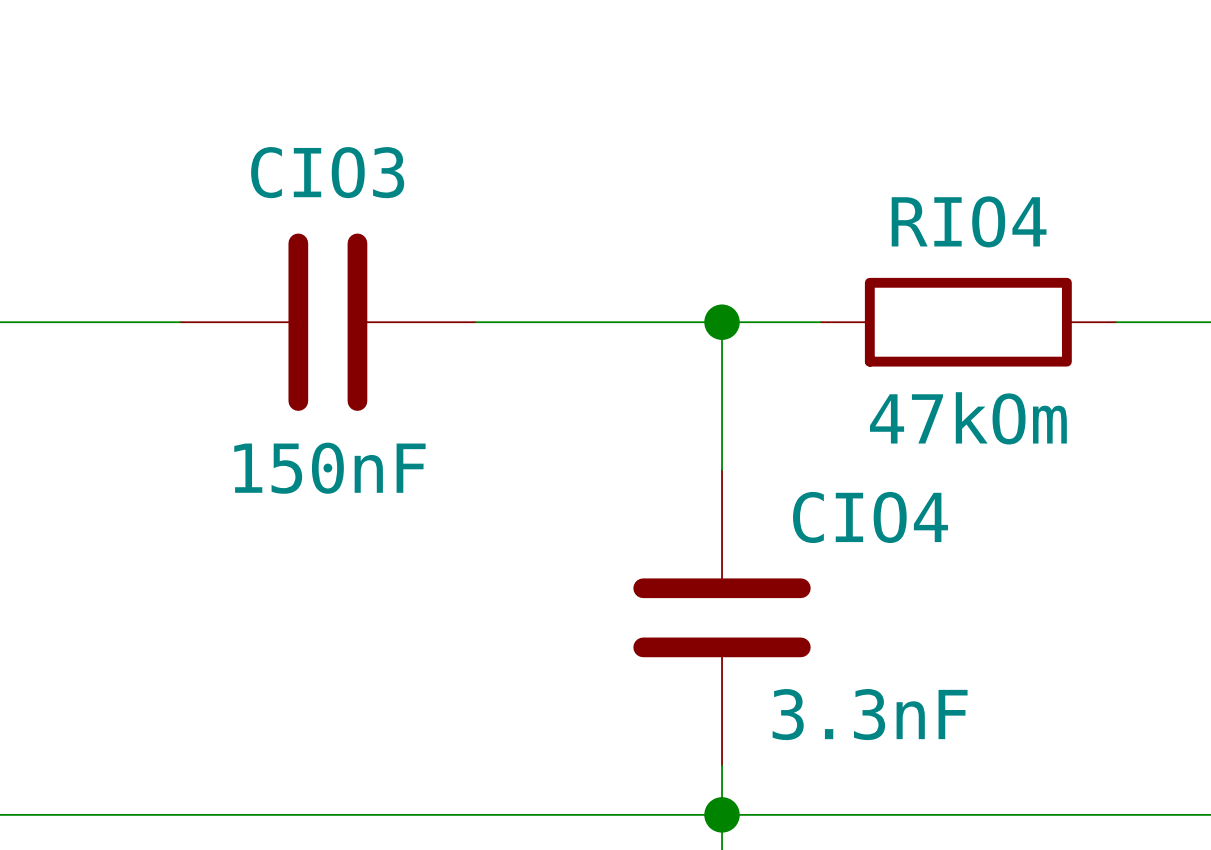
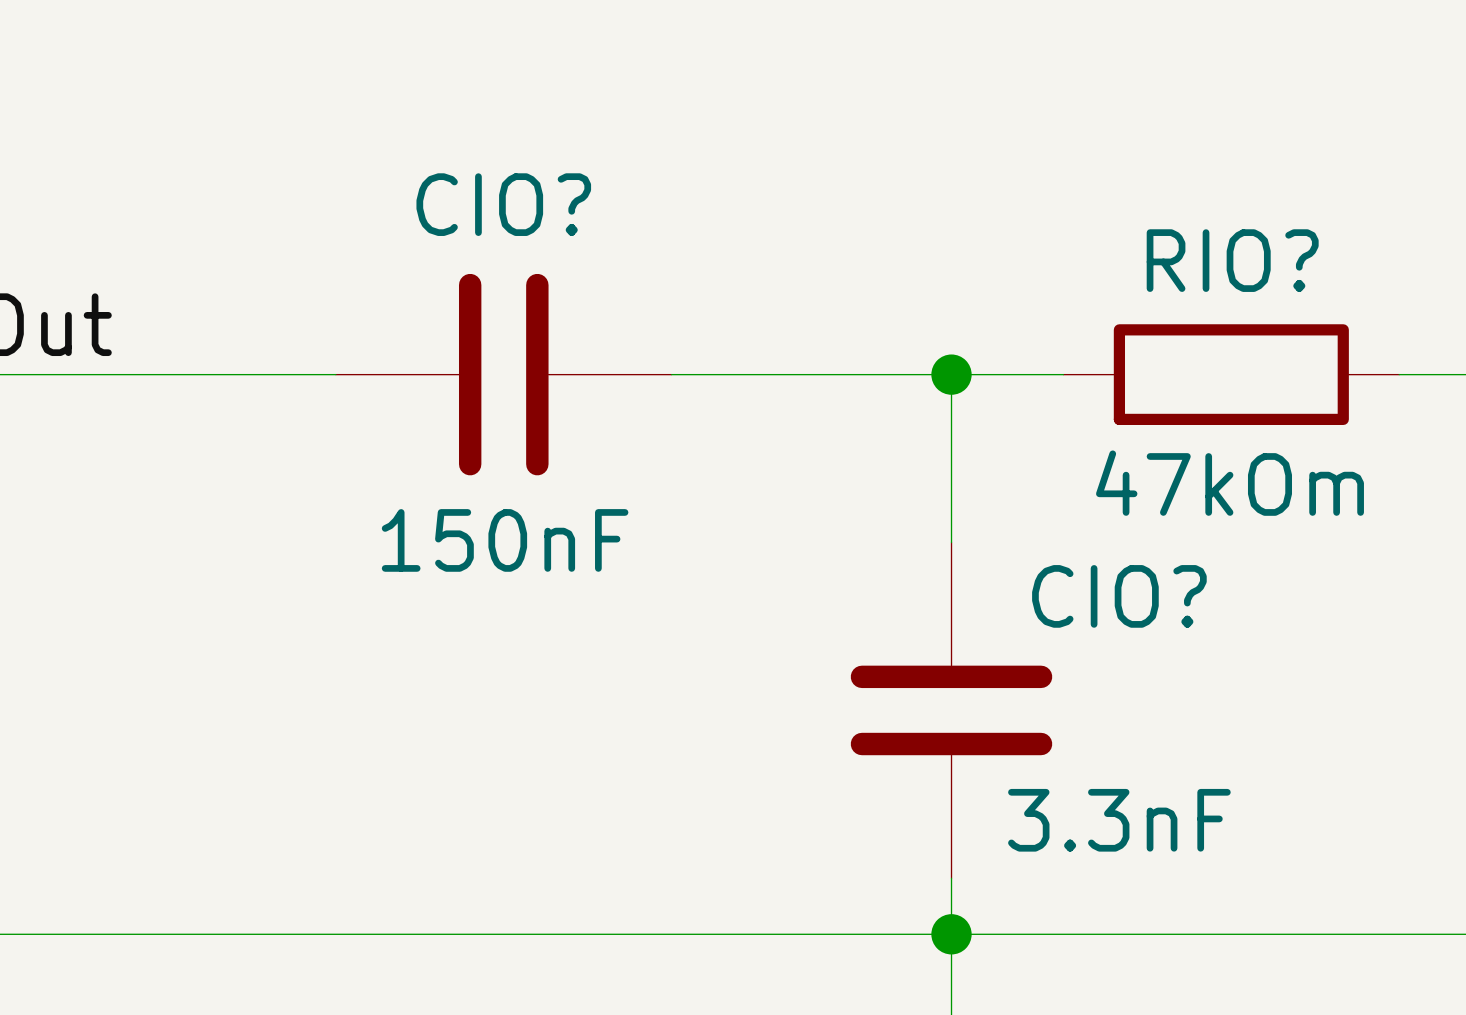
CIO3 name: CIO3 (327, 172) -> CIO? (503, 204)
RIO4 name: RIO4 (969, 221) -> RIO? (1232, 260)
CIO4 name: CIO4 (870, 517) -> CIO? (1119, 596)

